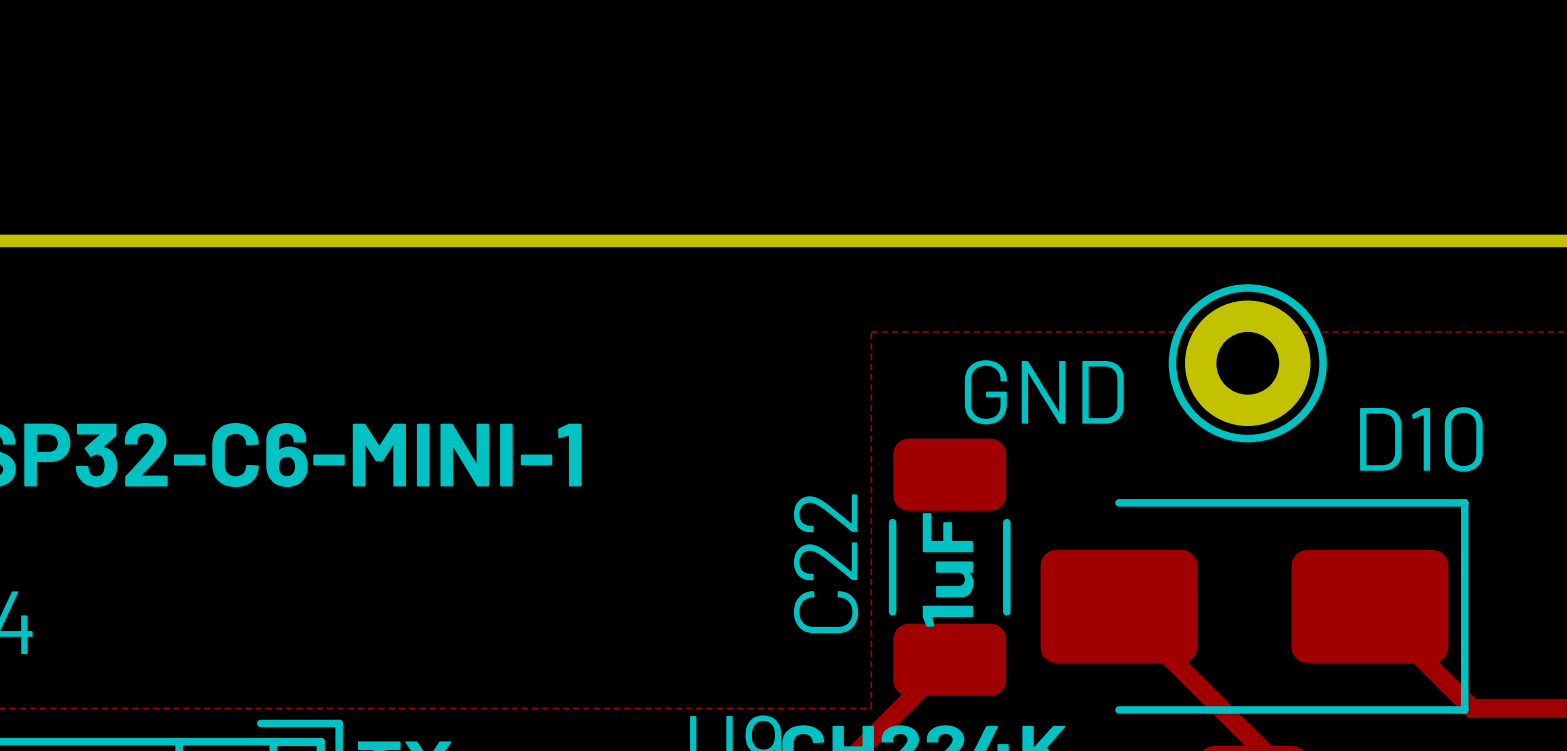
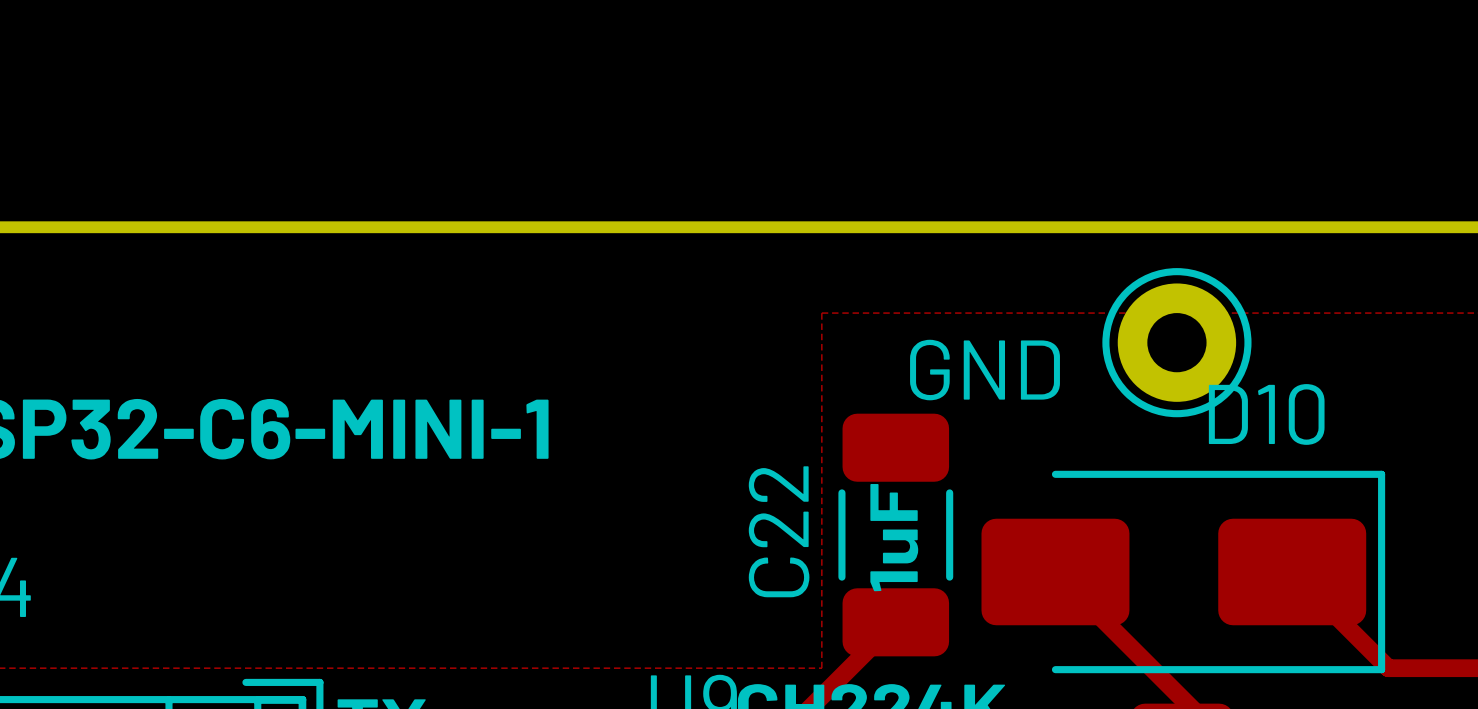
D10 name position: D10 (1421, 439) -> D10 (1266, 414)

